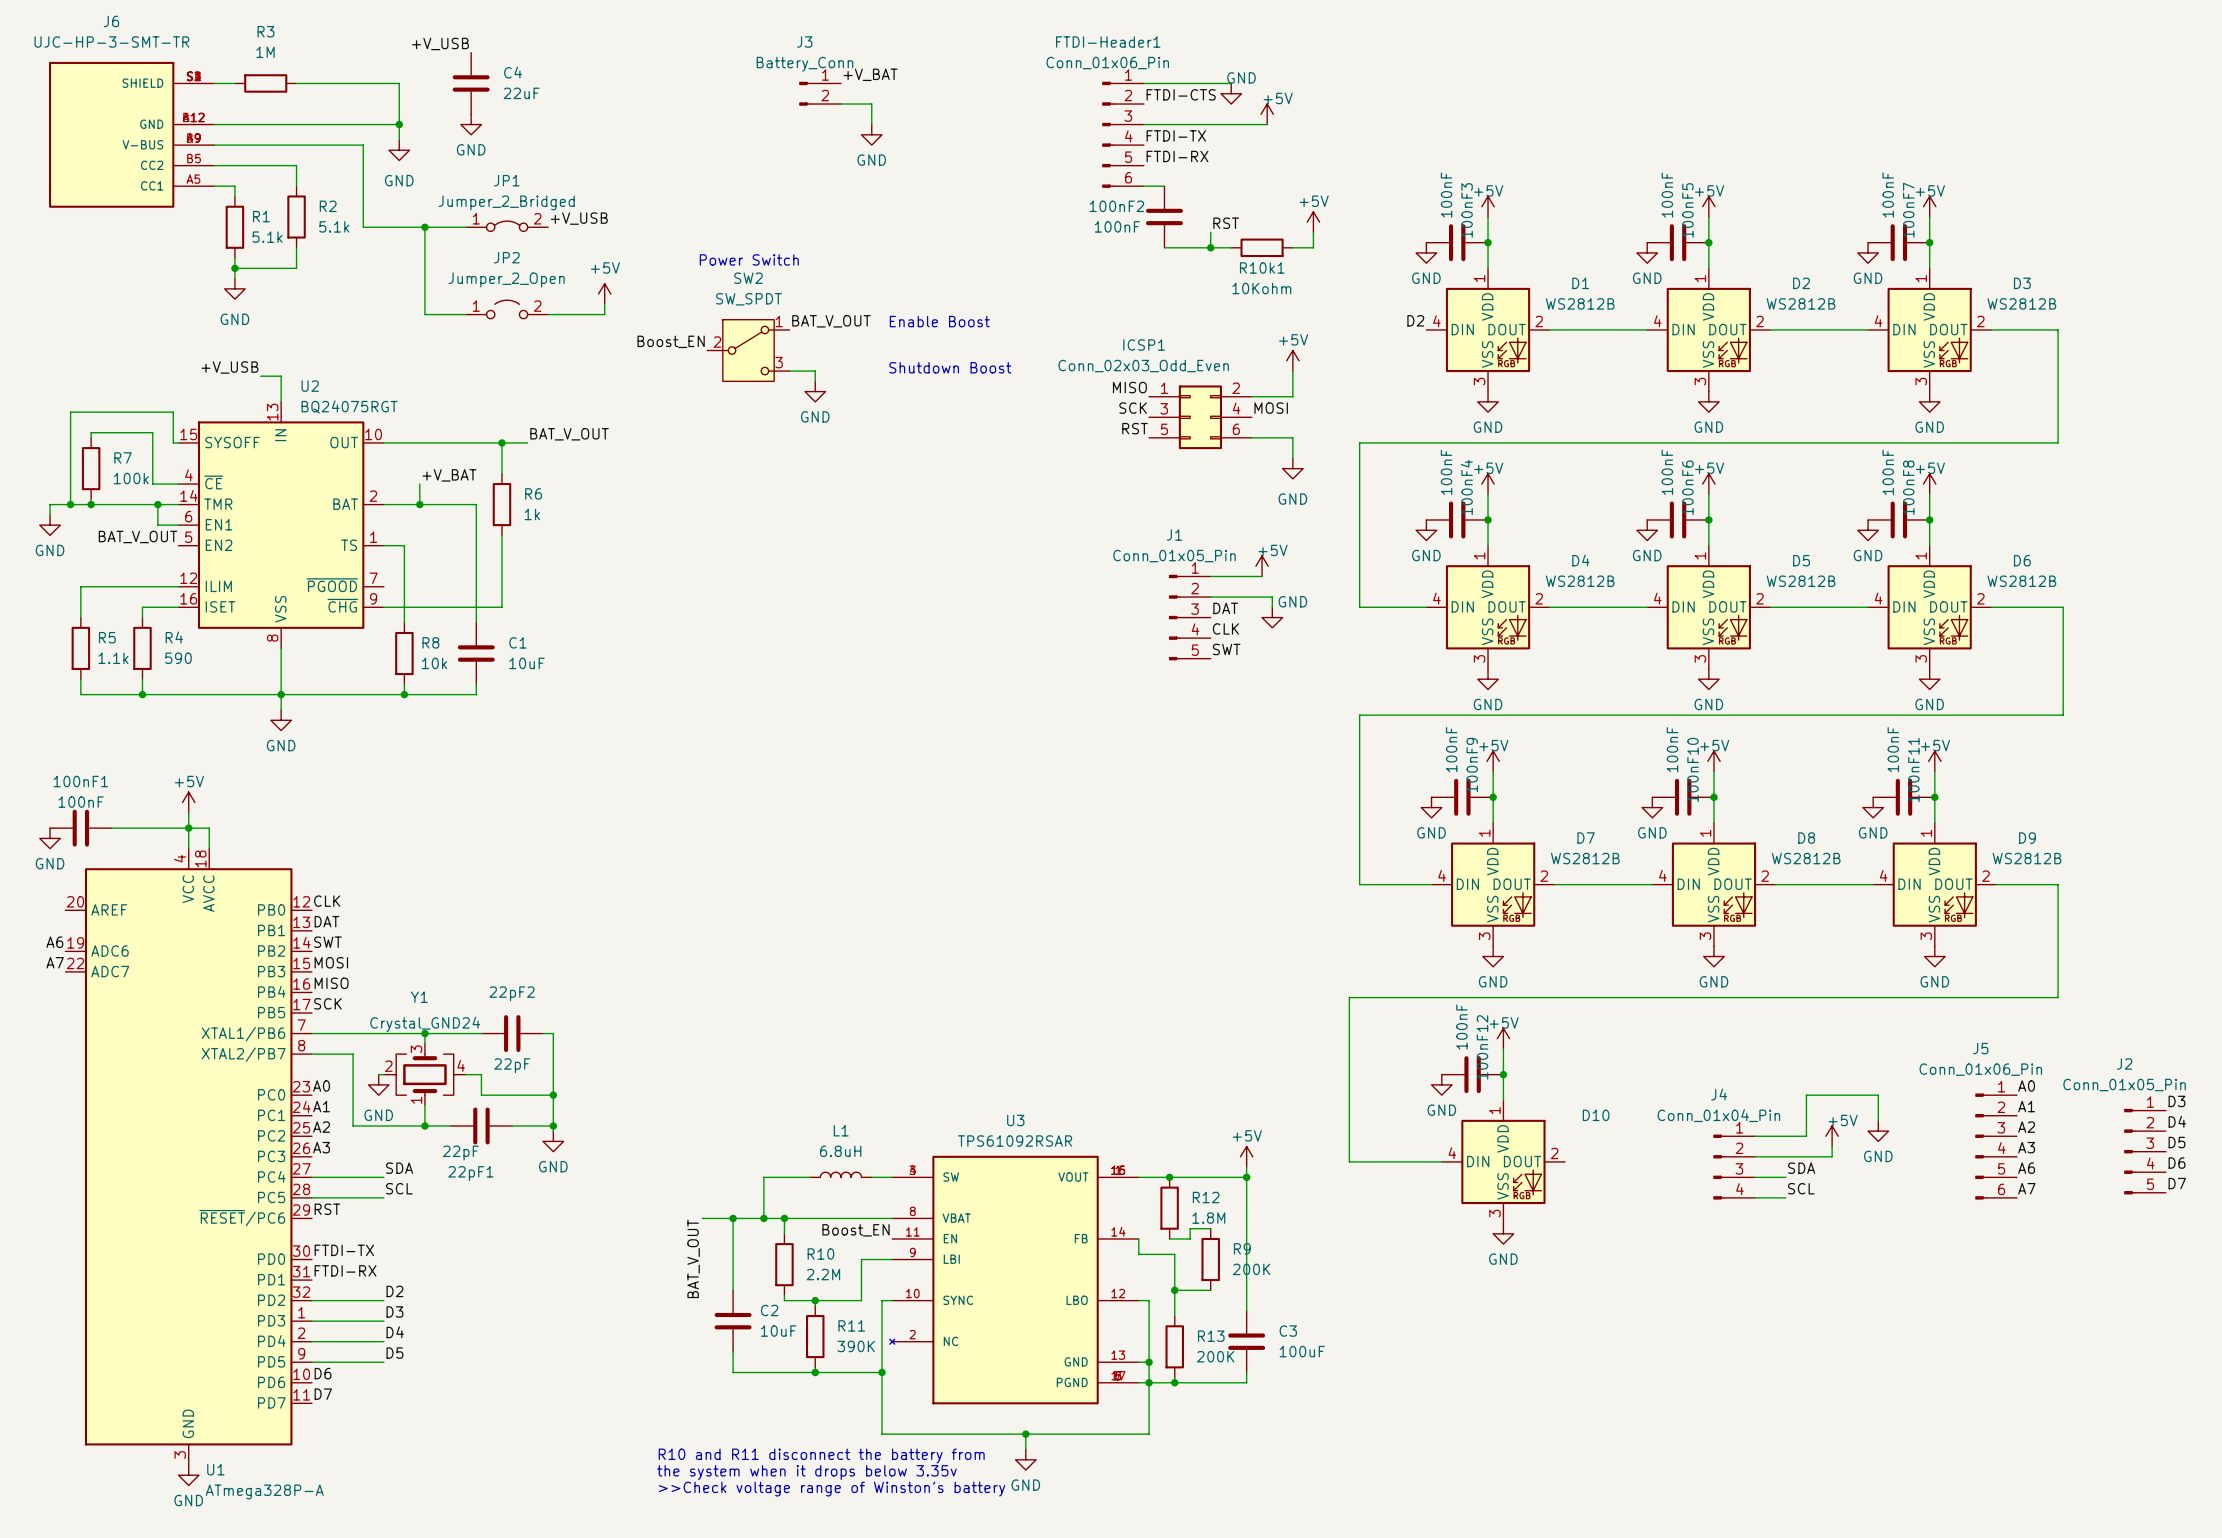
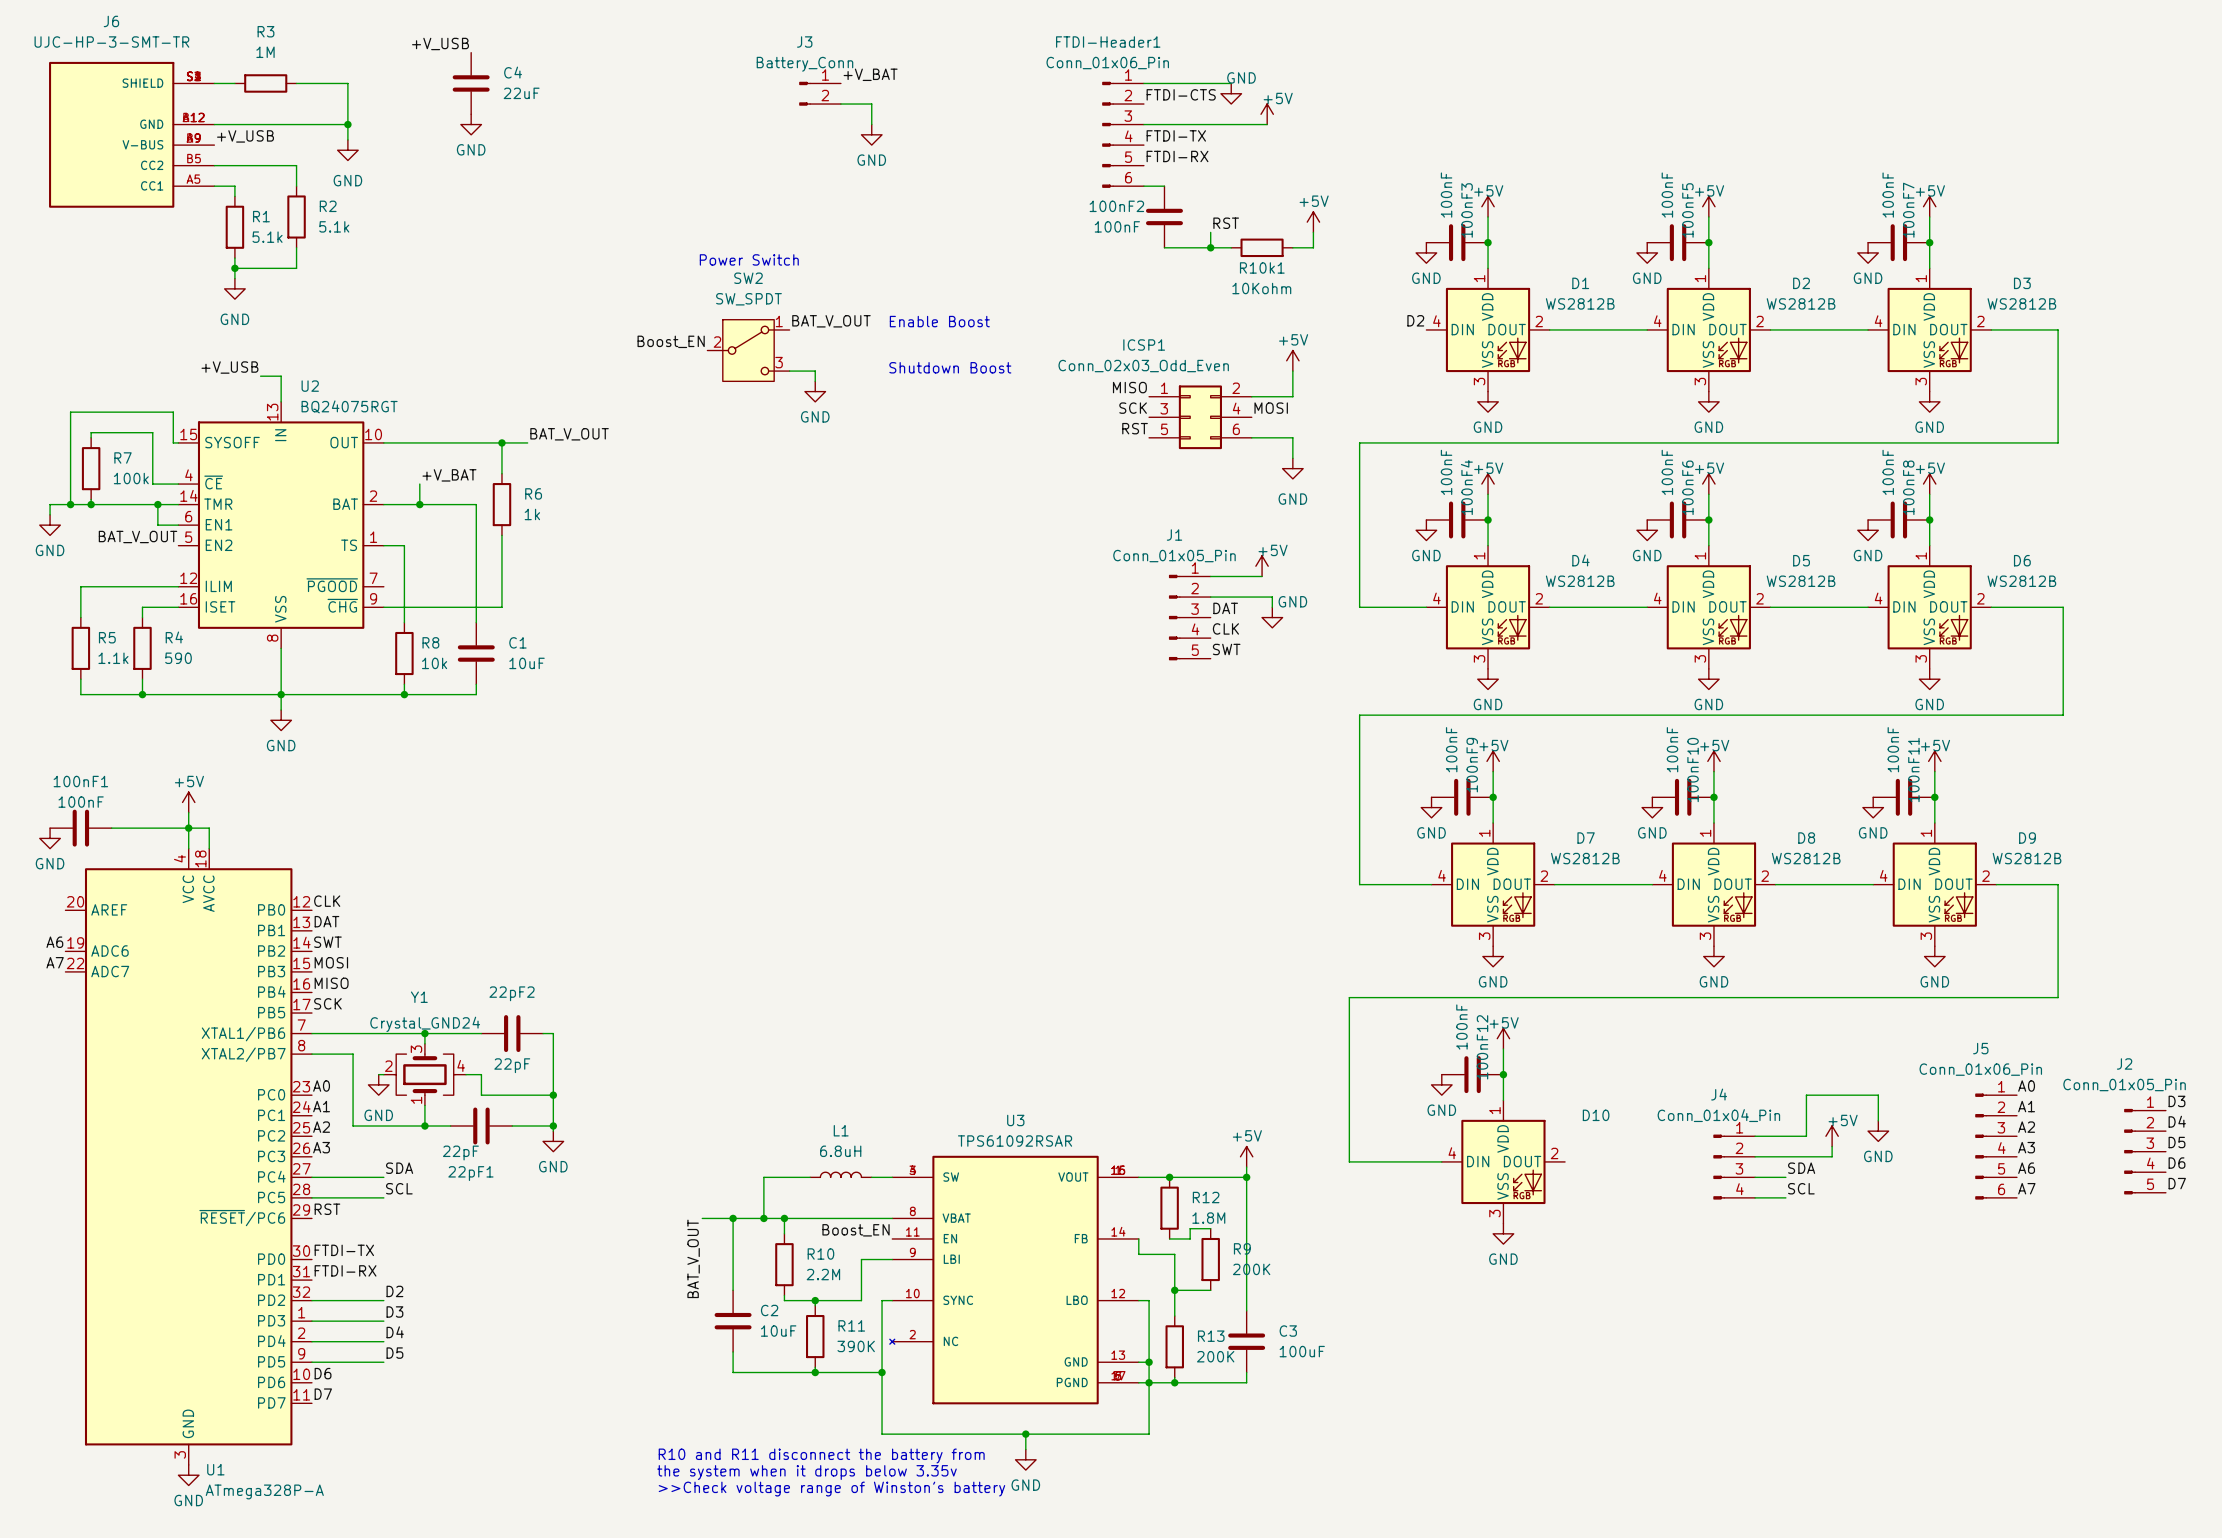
wire: (347, 83) (399, 83) (399, 139) -> (347, 83) (347, 139)
wire: (347, 124) (399, 124) -> none
junction: none -> (347, 124)
junction: (399, 124) -> none
label: none -> +V_USB (245, 136)
wire: (214, 145) (363, 145) (363, 227) (466, 227) -> none
power symbol position: GND (399, 150) -> GND (347, 150)
label: +V_USB (579, 218) -> none
JP1: Jumper_2_Bridged (507, 226) -> none
wire: (424, 227) (424, 314) (466, 314) -> none
junction: (424, 227) -> none
power symbol: +5V (604, 294) -> none
wire: (604, 304) (604, 314) (548, 314) -> none
JP2: Jumper_2_Open (507, 309) -> none

